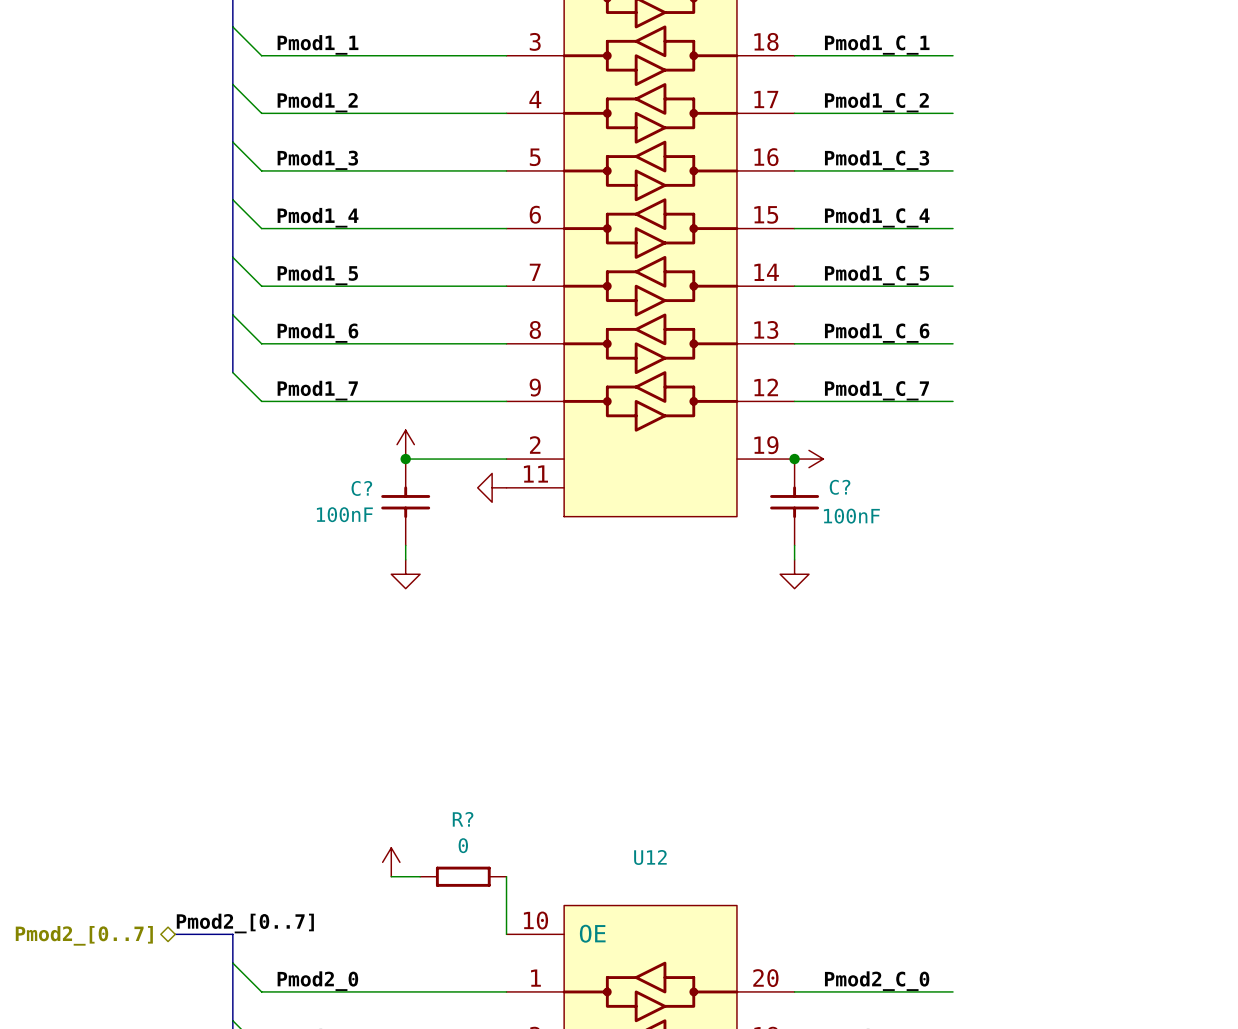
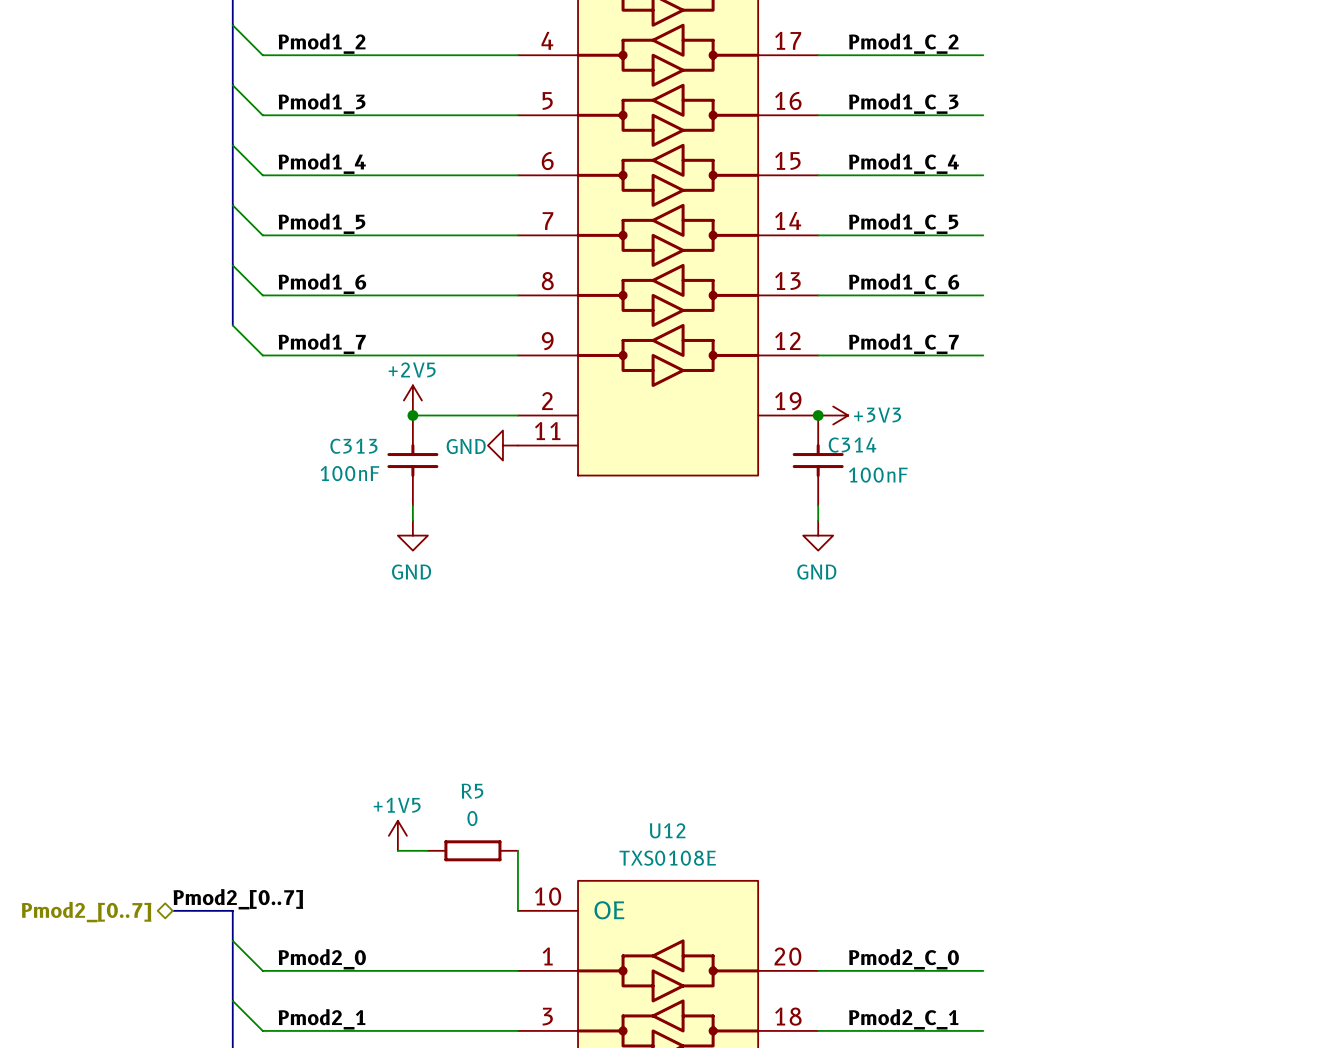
power symbol text: none -> +2V5 (412, 370)
power symbol text: none -> +3V3 (877, 415)
C? name: C? (840, 487) -> C314 (852, 445)
C? name: C? (361, 488) -> C313 (353, 446)
power symbol text: none -> GND (466, 446)
power symbol text: none -> GND (411, 572)
power symbol text: none -> GND (816, 572)
R? name: R? (463, 819) -> R5 (472, 791)
power symbol text: none -> +1V5 (397, 805)
U12 value: none -> TXS0108E (667, 858)

